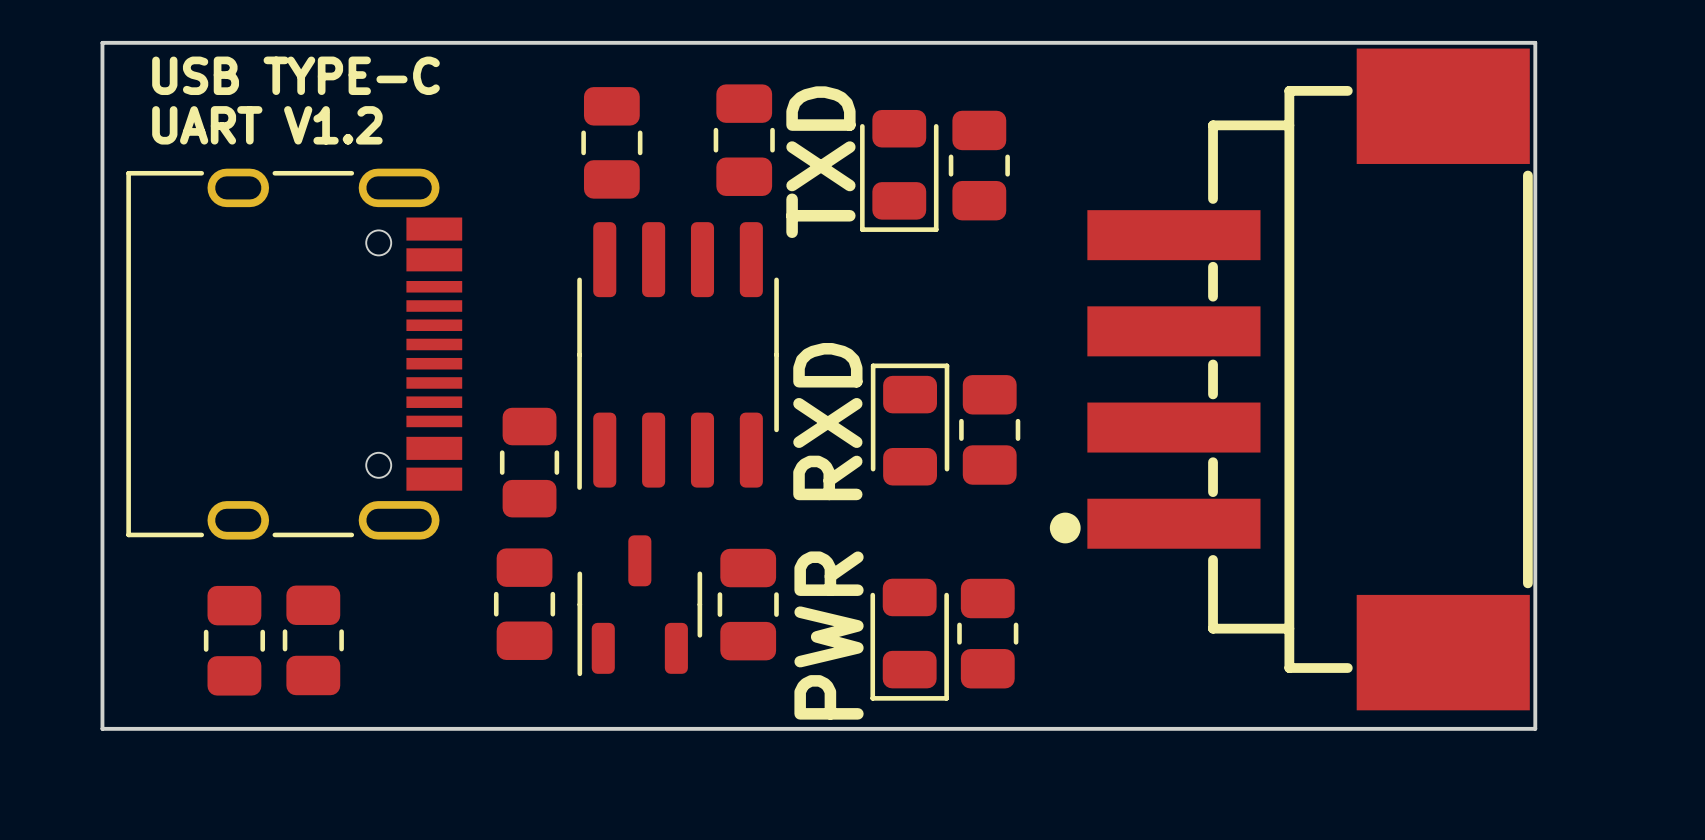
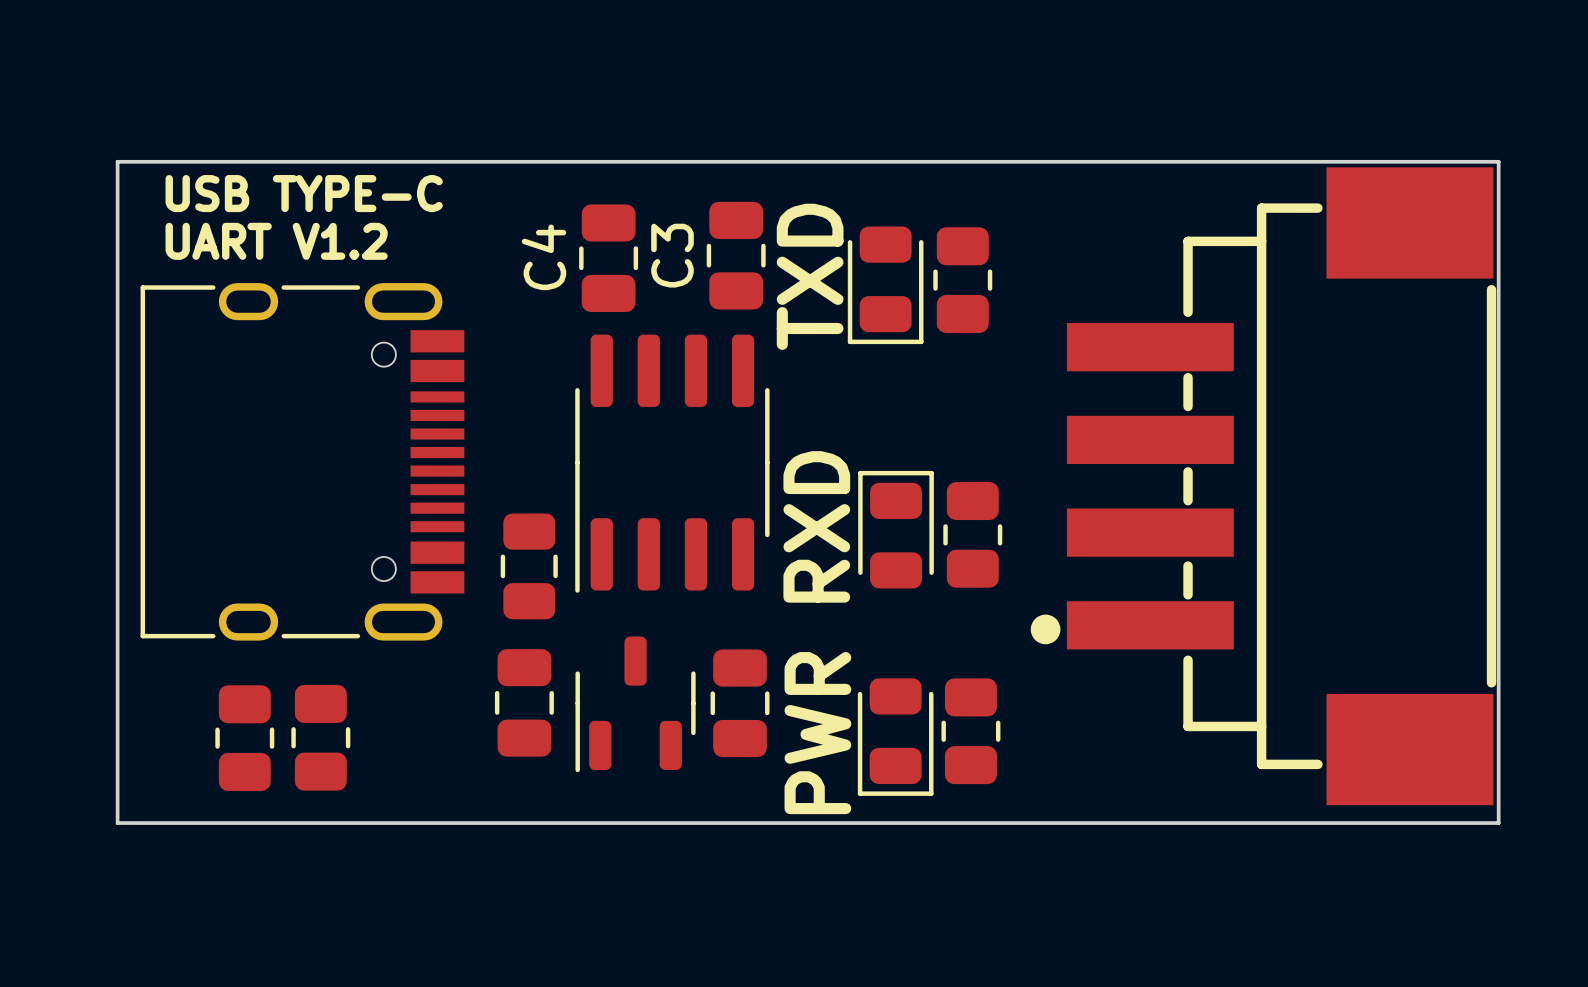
C3 name: none -> C3 (672, 255)
C4 name: none -> C4 (544, 257)

